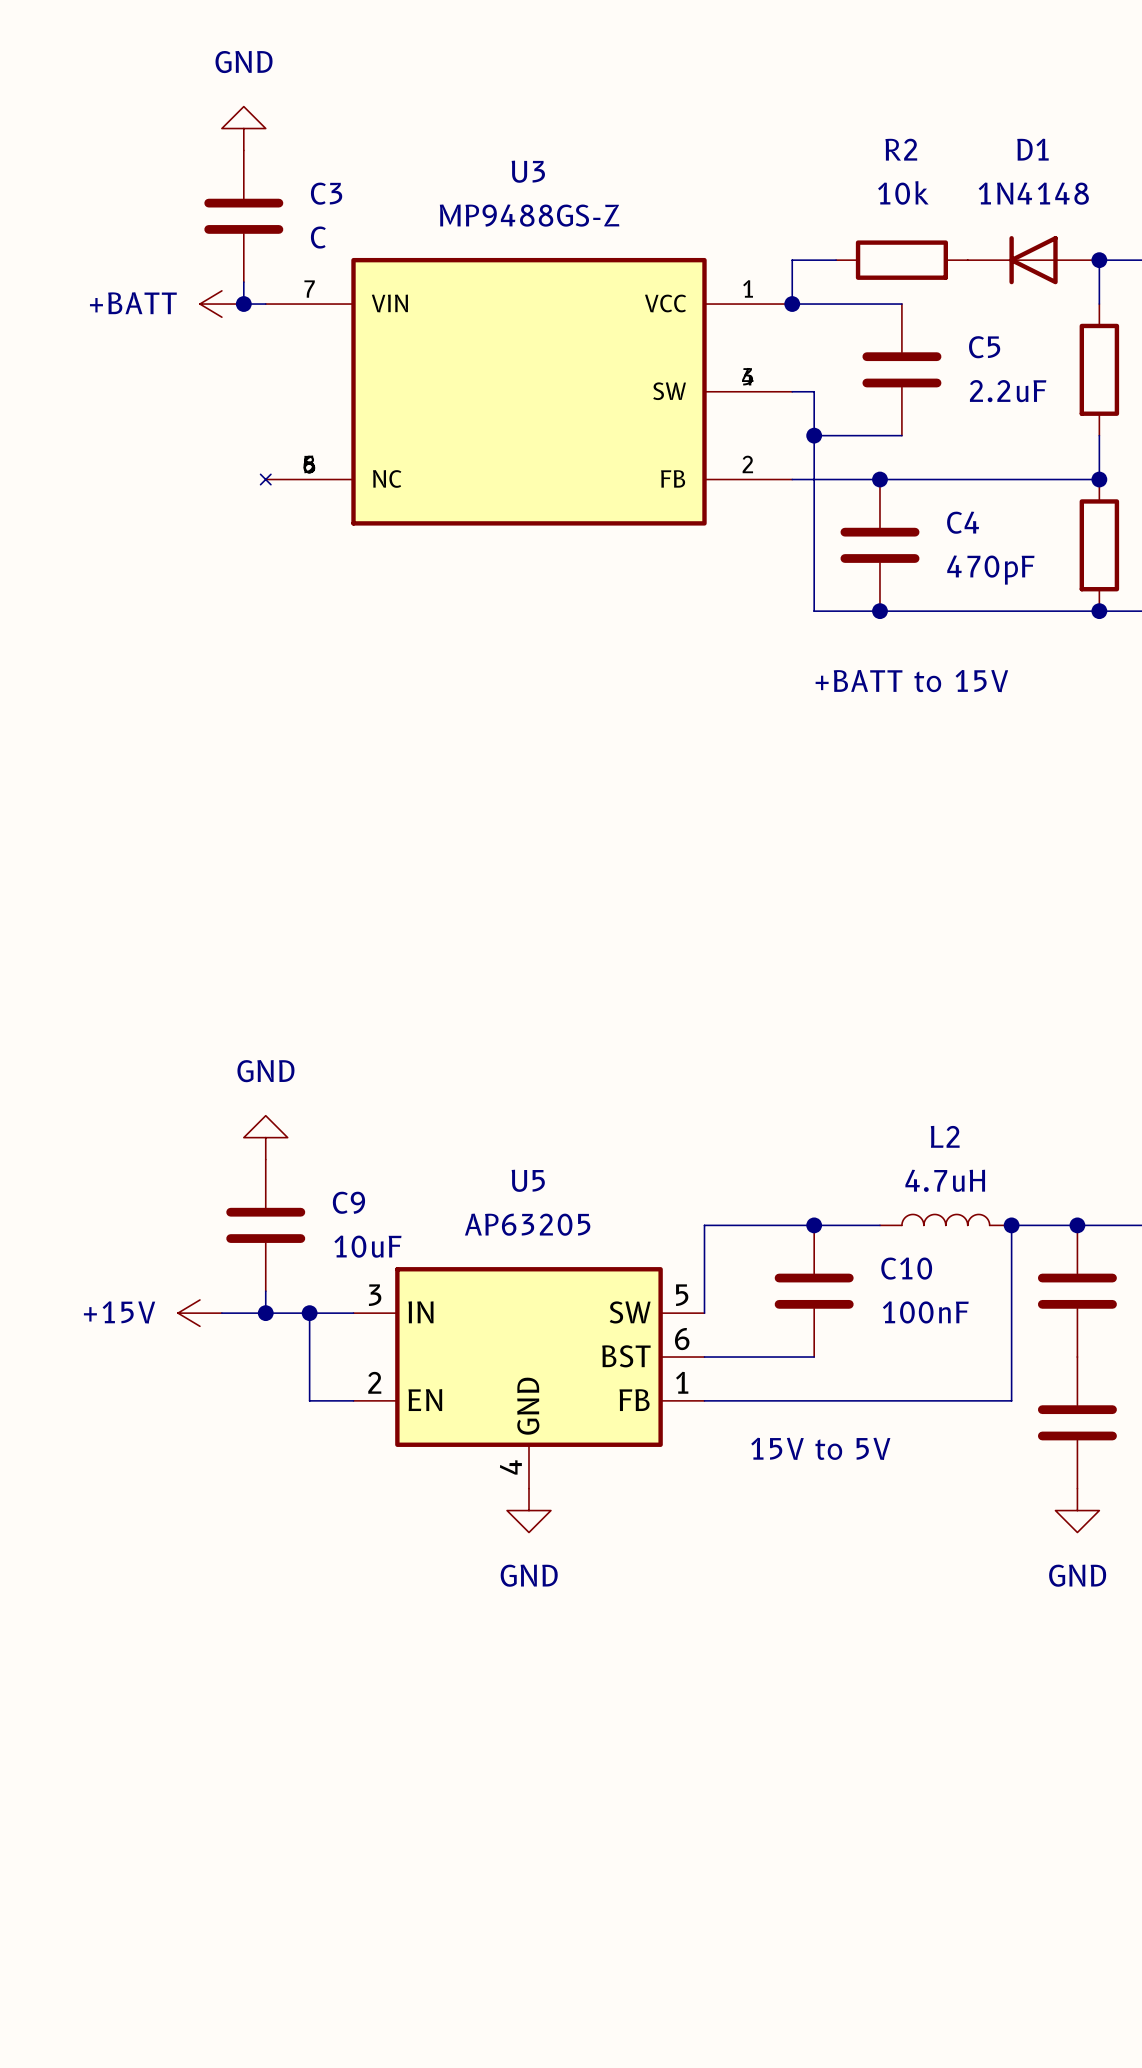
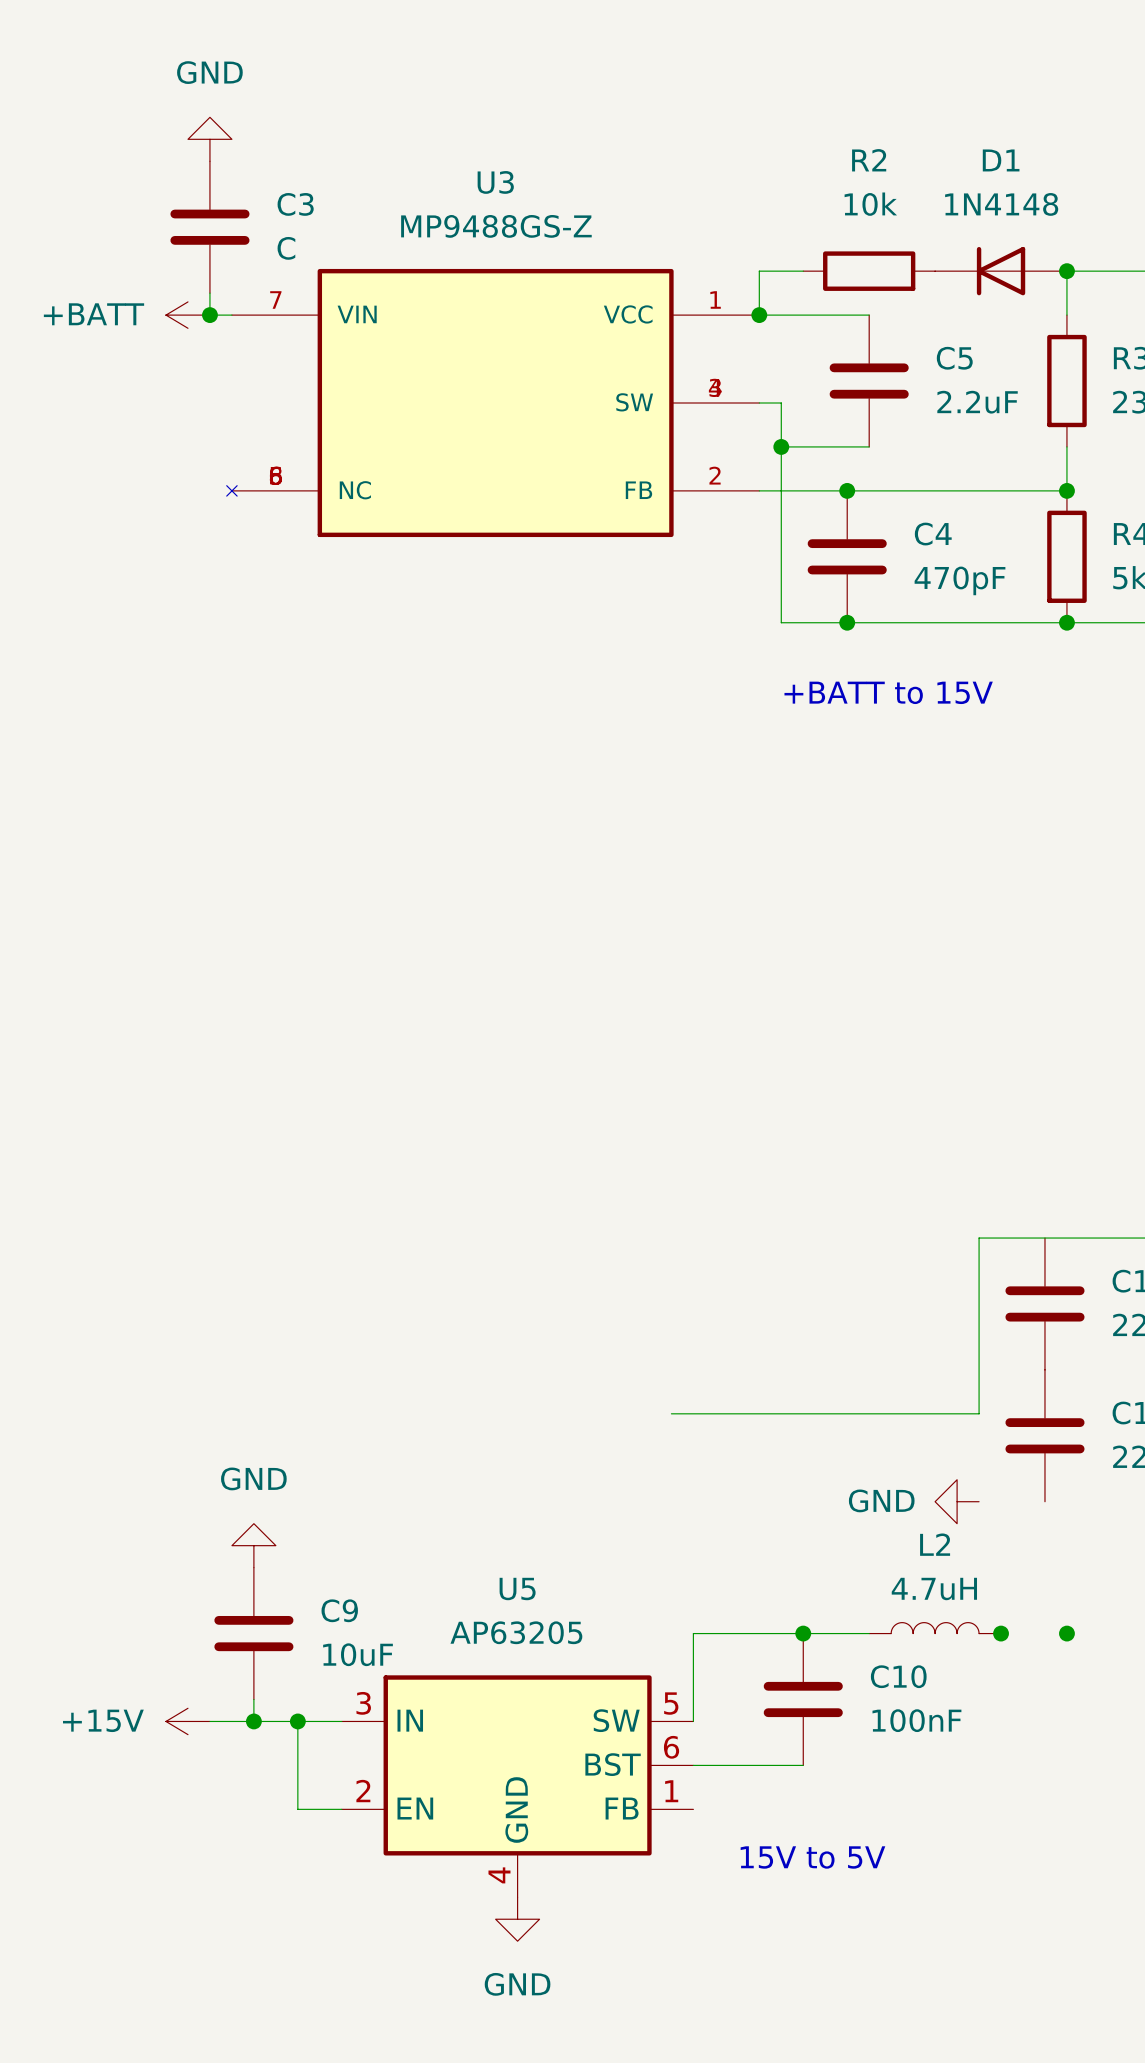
power symbol: GND (265, 1137) -> none
L2 position: (945, 1219) -> (935, 1628)
C9 position: (265, 1225) -> (253, 1633)
junction: (814, 1225) -> none
wire: (879, 1225) (704, 1225) (704, 1313) -> (869, 1633) (693, 1633) (693, 1721)
junction: (1011, 1225) -> none
junction: (1077, 1225) -> none
wire: (265, 1291) (265, 1313) -> (253, 1699) (253, 1721)
C10 position: (814, 1291) -> (803, 1699)
power symbol position: +15V (199, 1313) -> +15V (187, 1721)
wire: (221, 1313) (353, 1313) -> (209, 1721) (341, 1721)
junction: (265, 1313) -> none
wire: (309, 1313) (309, 1400) (353, 1400) -> (297, 1721) (297, 1809) (341, 1809)
junction: (309, 1313) -> none
wire: (704, 1357) (814, 1357) -> (693, 1765) (803, 1765)
U5 position: (528, 1377) -> (517, 1786)
text position: 15V to 5V (820, 1448) -> 15V to 5V (812, 1857)
power symbol: GND (528, 1510) -> none
power symbol rotation: 0° (1077, 1510) -> 90° clockwise (957, 1501)
power symbol position: GND (1077, 1510) -> GND (957, 1501)
power symbol: none -> GND (253, 1545)
junction: none -> (803, 1633)
junction: none -> (1001, 1633)
junction: none -> (1066, 1633)
junction: none -> (253, 1721)
junction: none -> (297, 1721)
power symbol: none -> GND (517, 1919)

